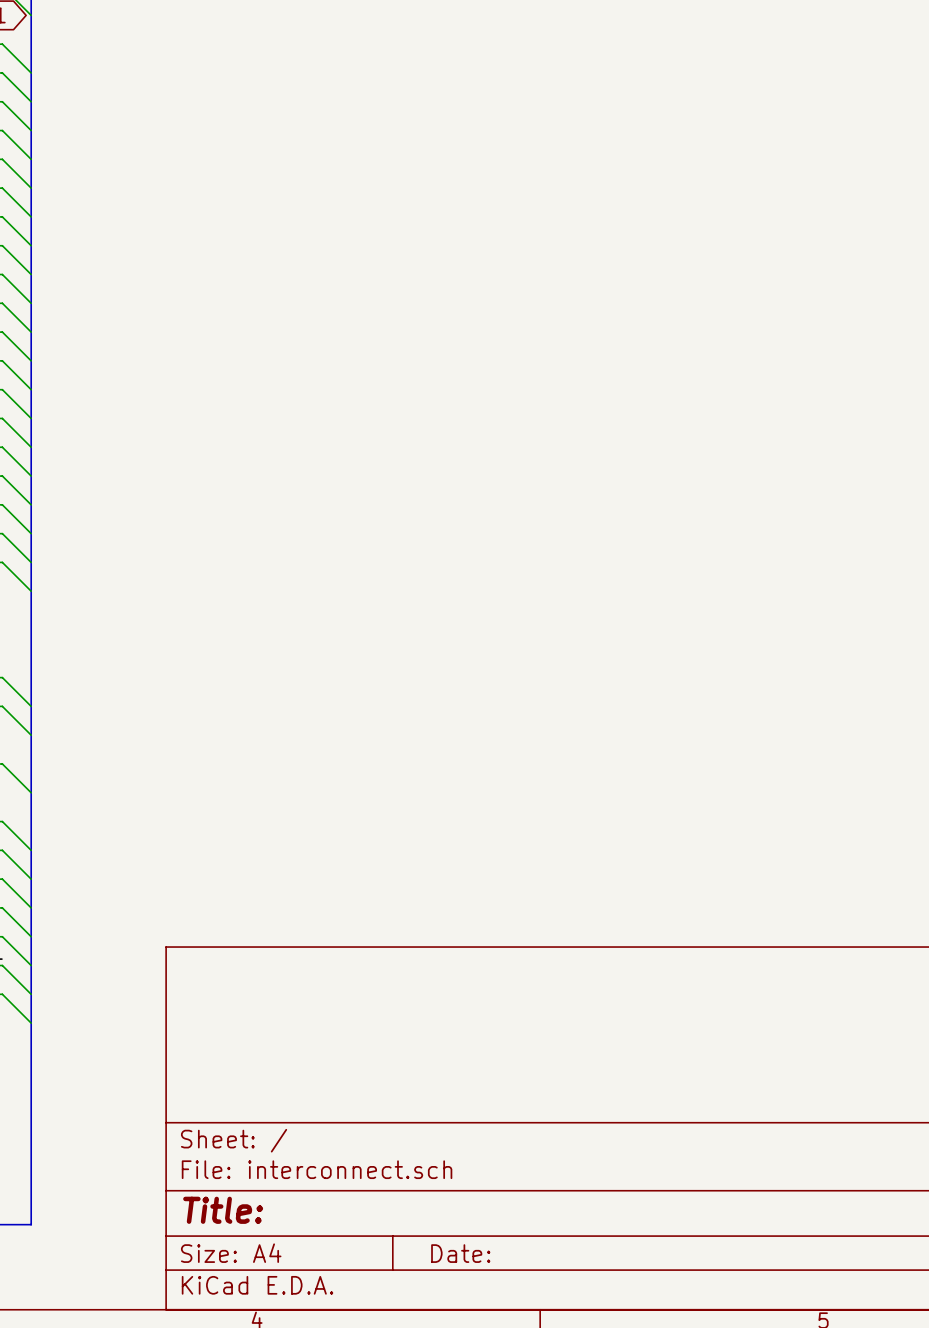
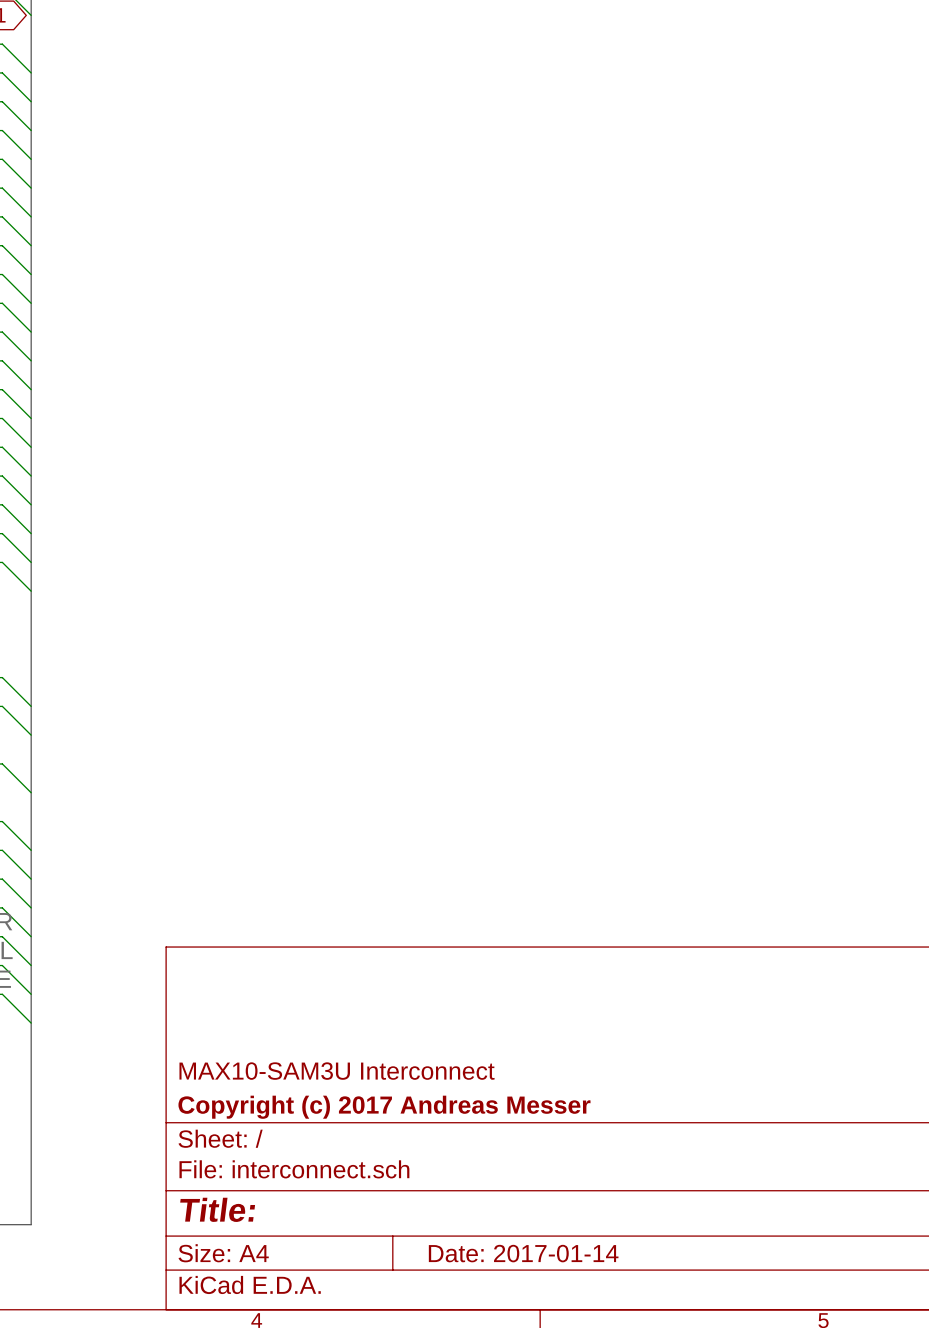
title block: none -> MAX10-SAM3U Interconnect (337, 1071)
title block: none -> Copyright (c) 2017 Andreas Messer (384, 1107)
title block: Date: (460, 1253) -> Date: 2017-01-14 (523, 1253)

